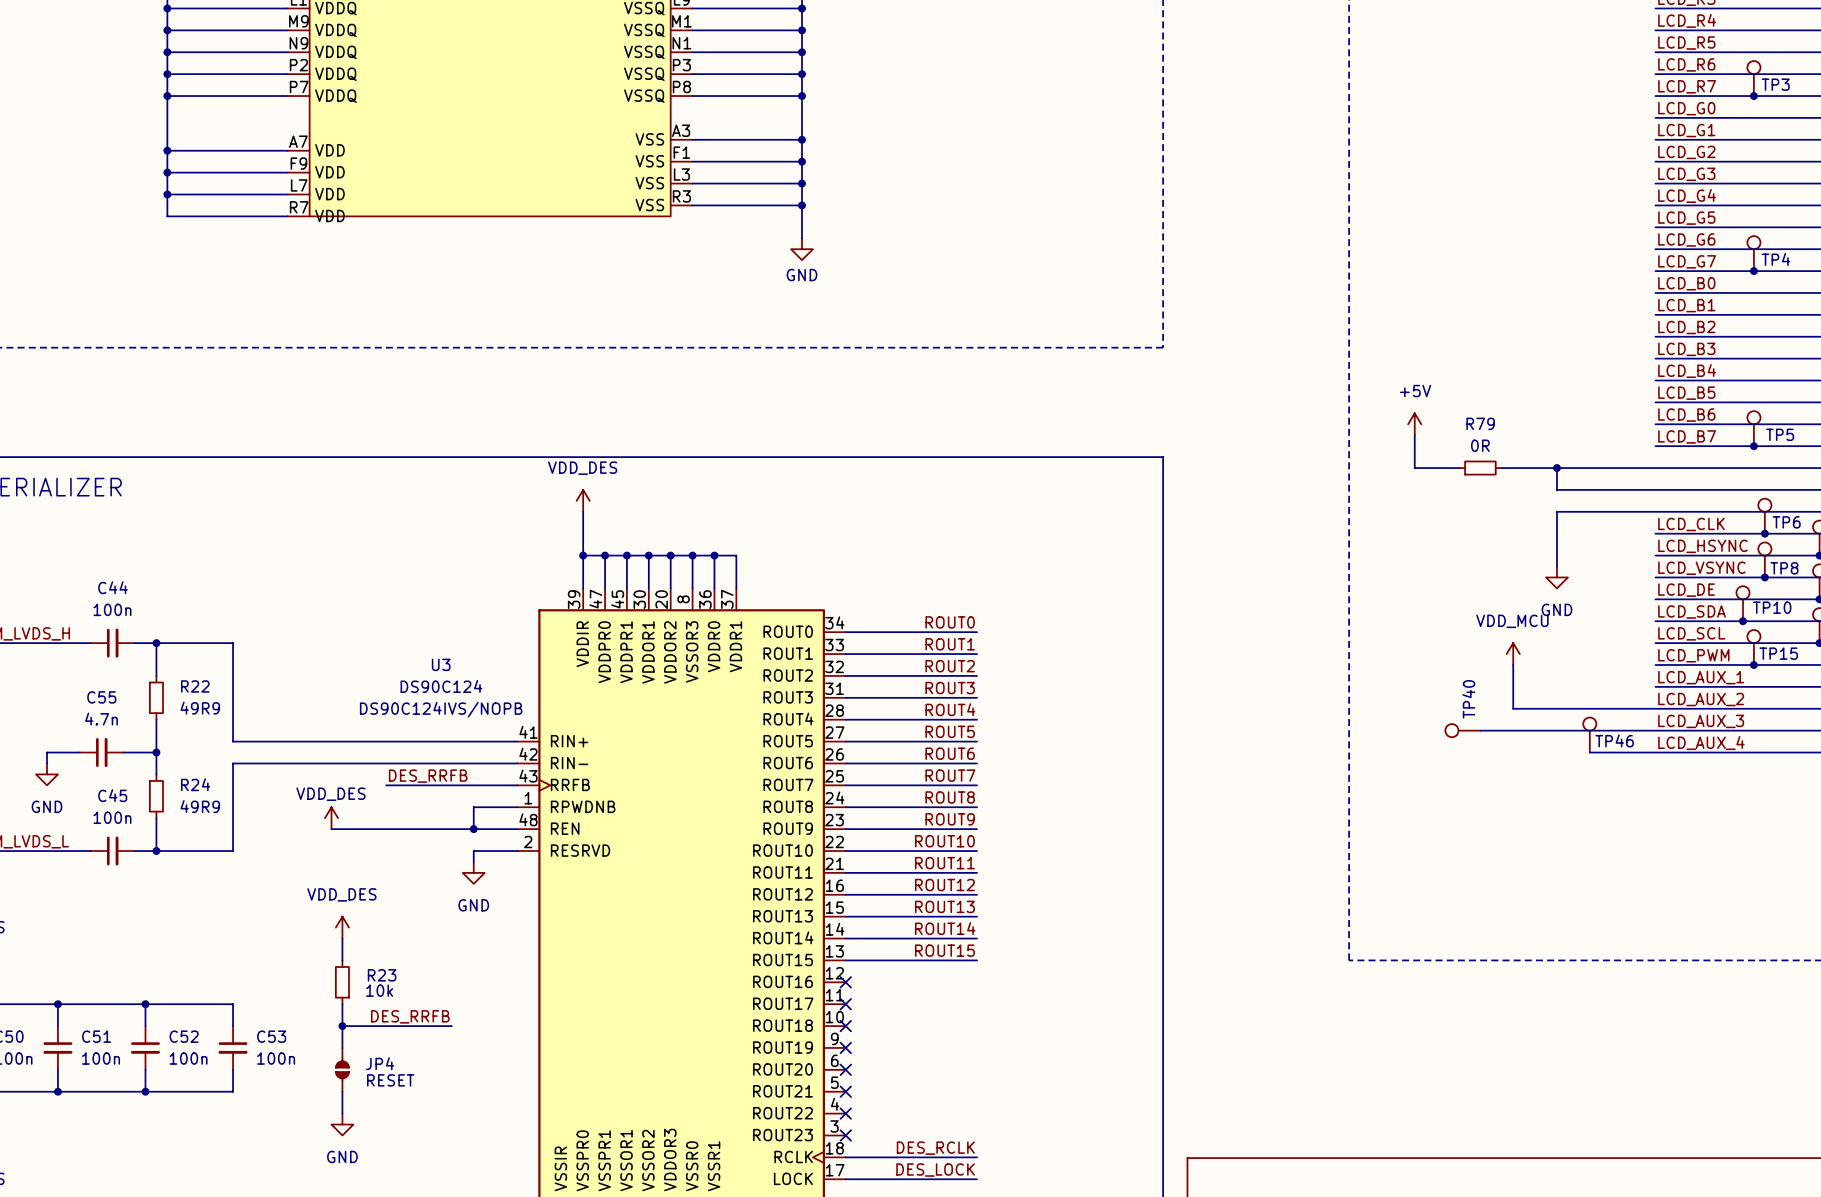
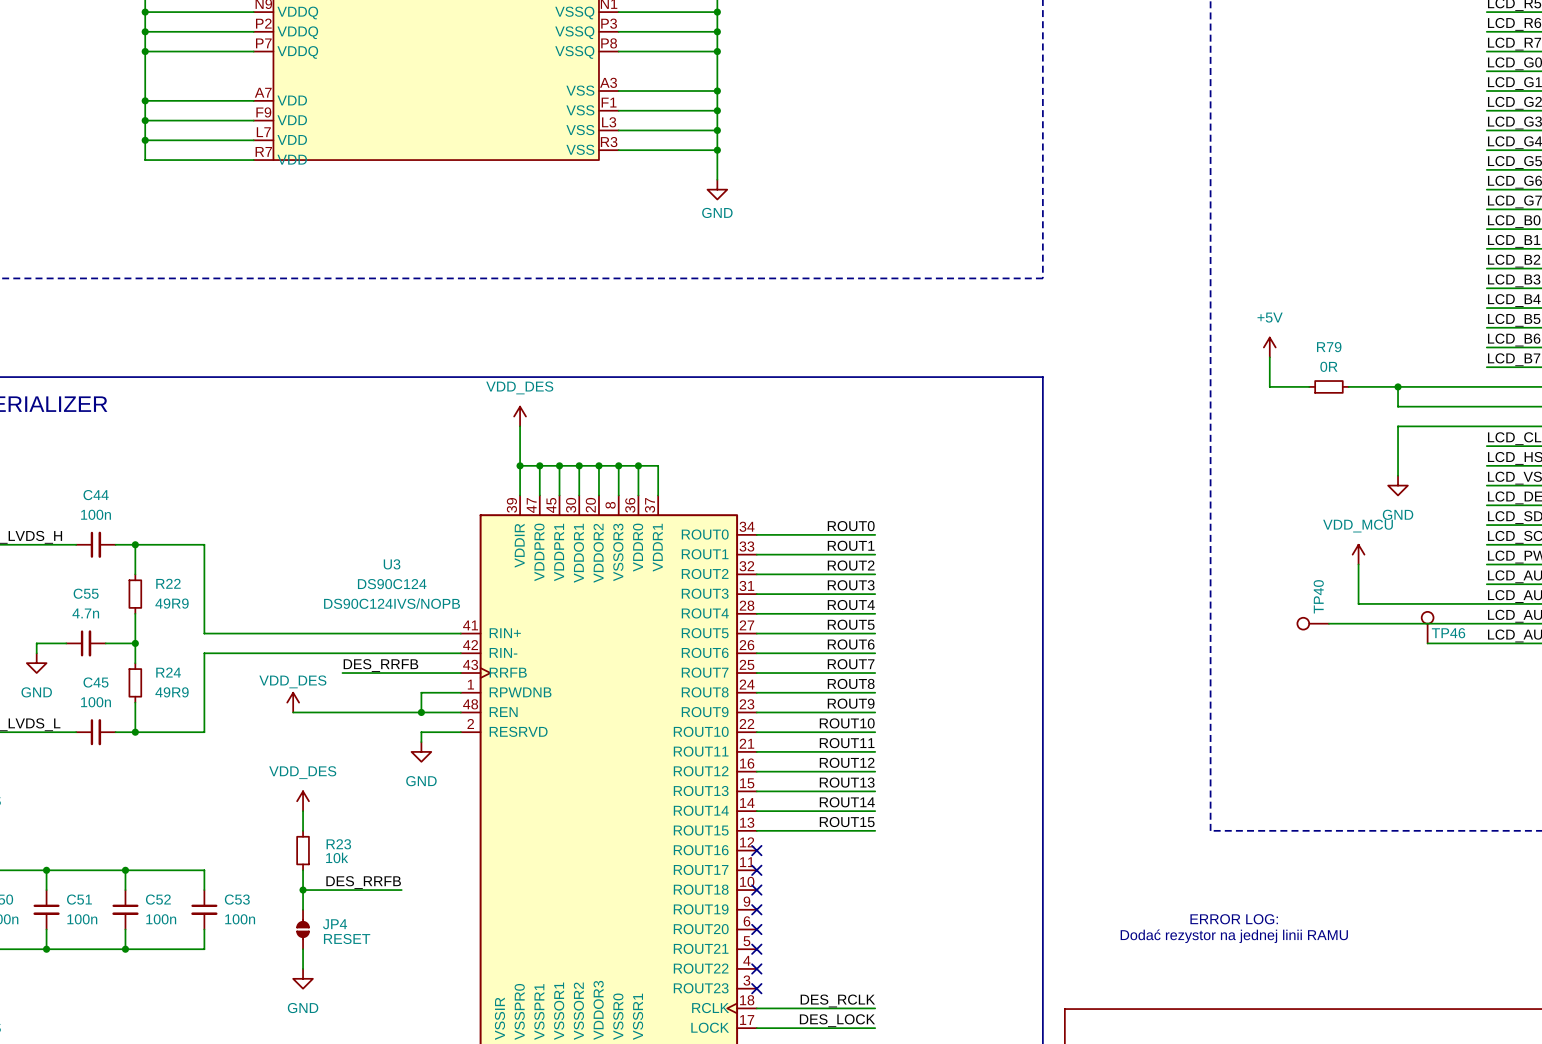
text: none -> ERROR LOG: (1234, 919)
text: none -> Dodać rezystor na jednej linii RAMU (1234, 936)

